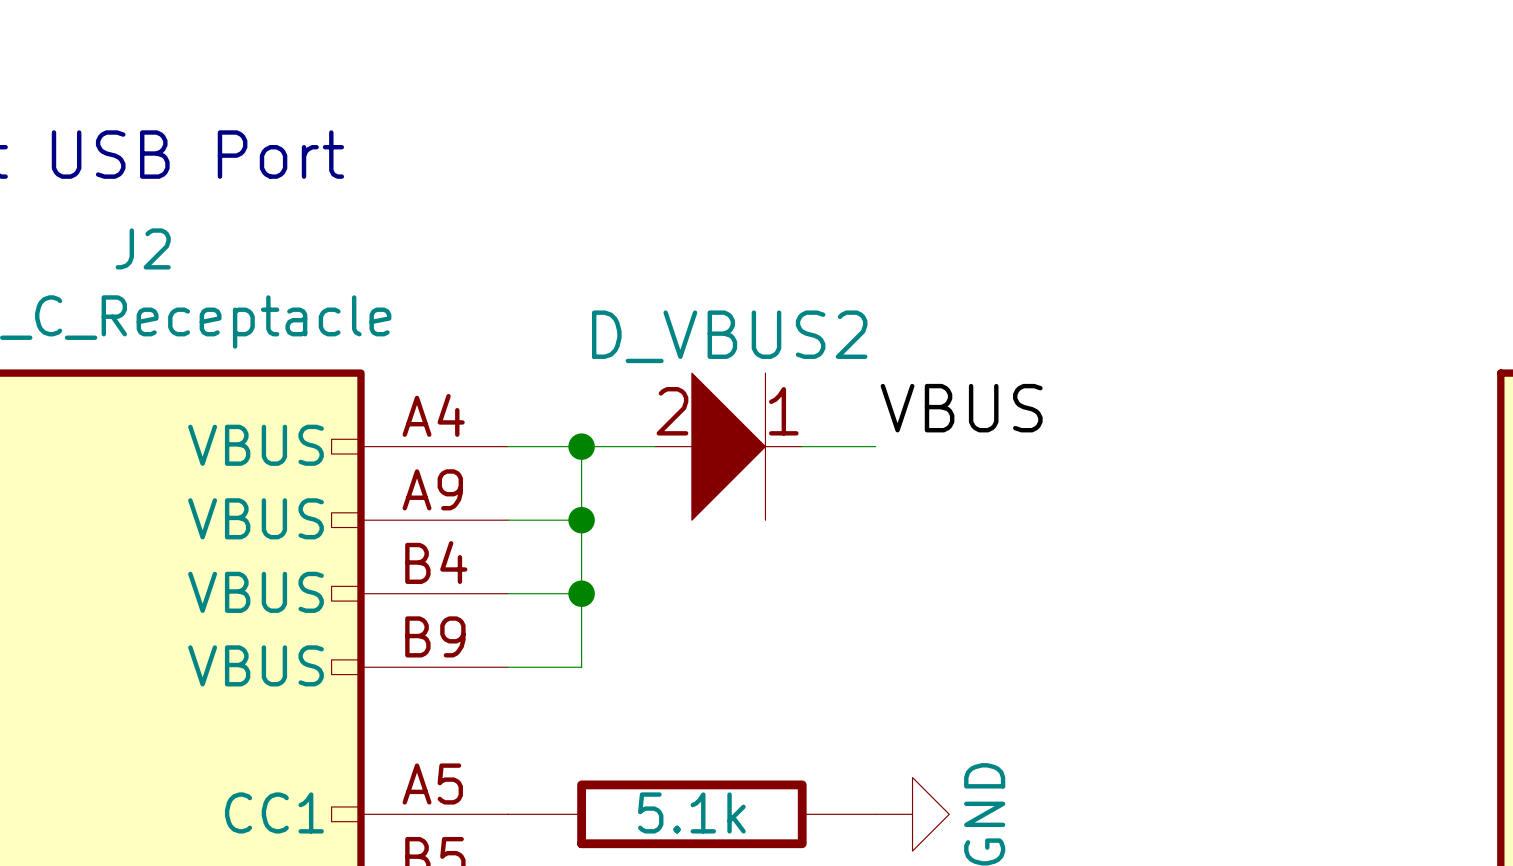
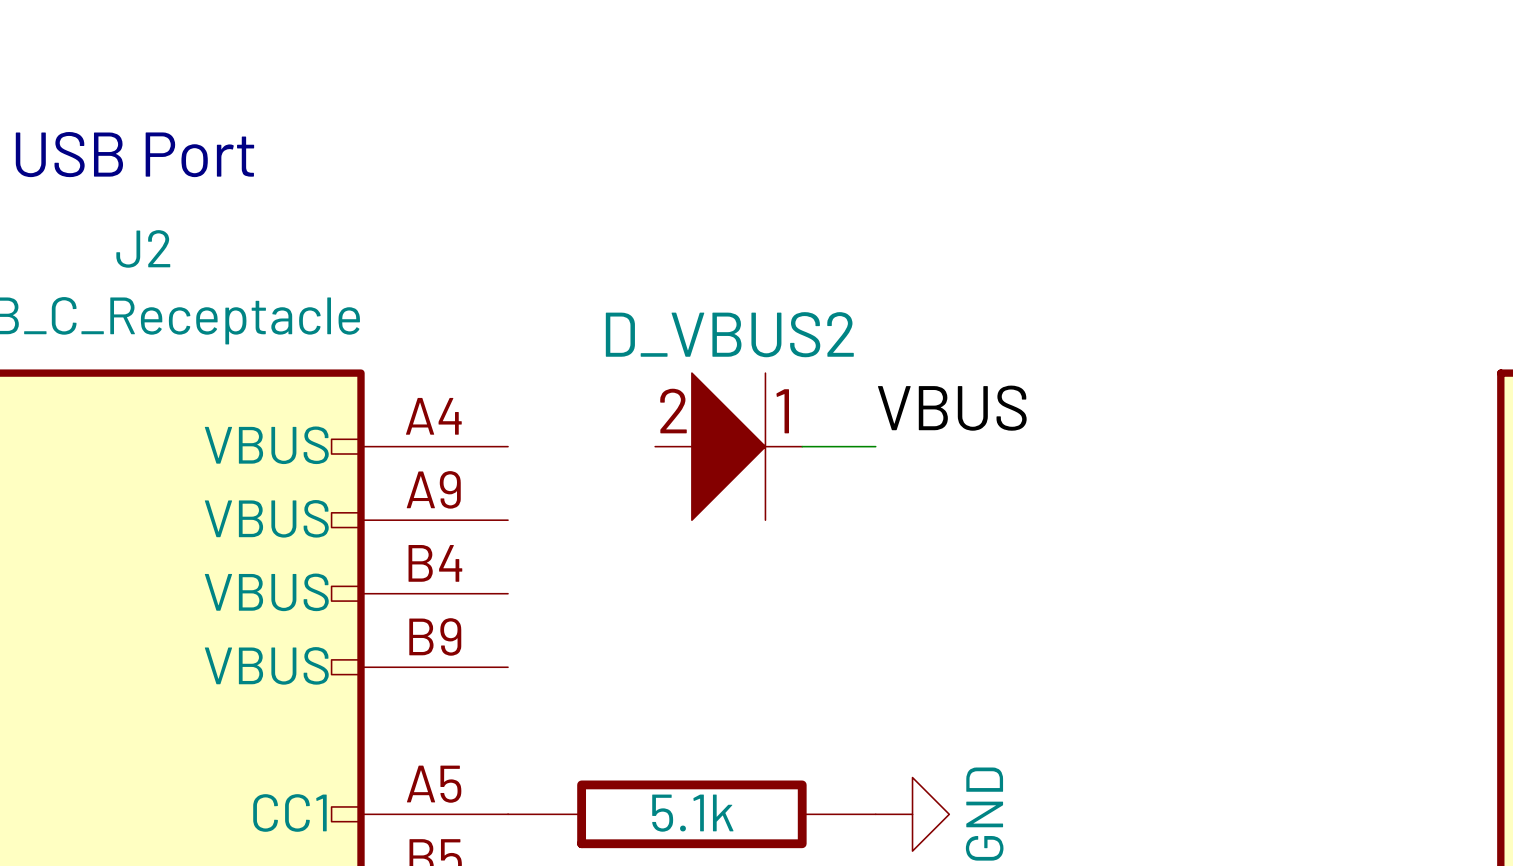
wire: (508, 446) (655, 446) -> none
wire: (581, 446) (581, 667) (508, 667) -> none
junction: (581, 446) -> none
wire: (508, 520) (581, 520) -> none
junction: (581, 520) -> none
wire: (508, 593) (581, 593) -> none
junction: (581, 593) -> none

